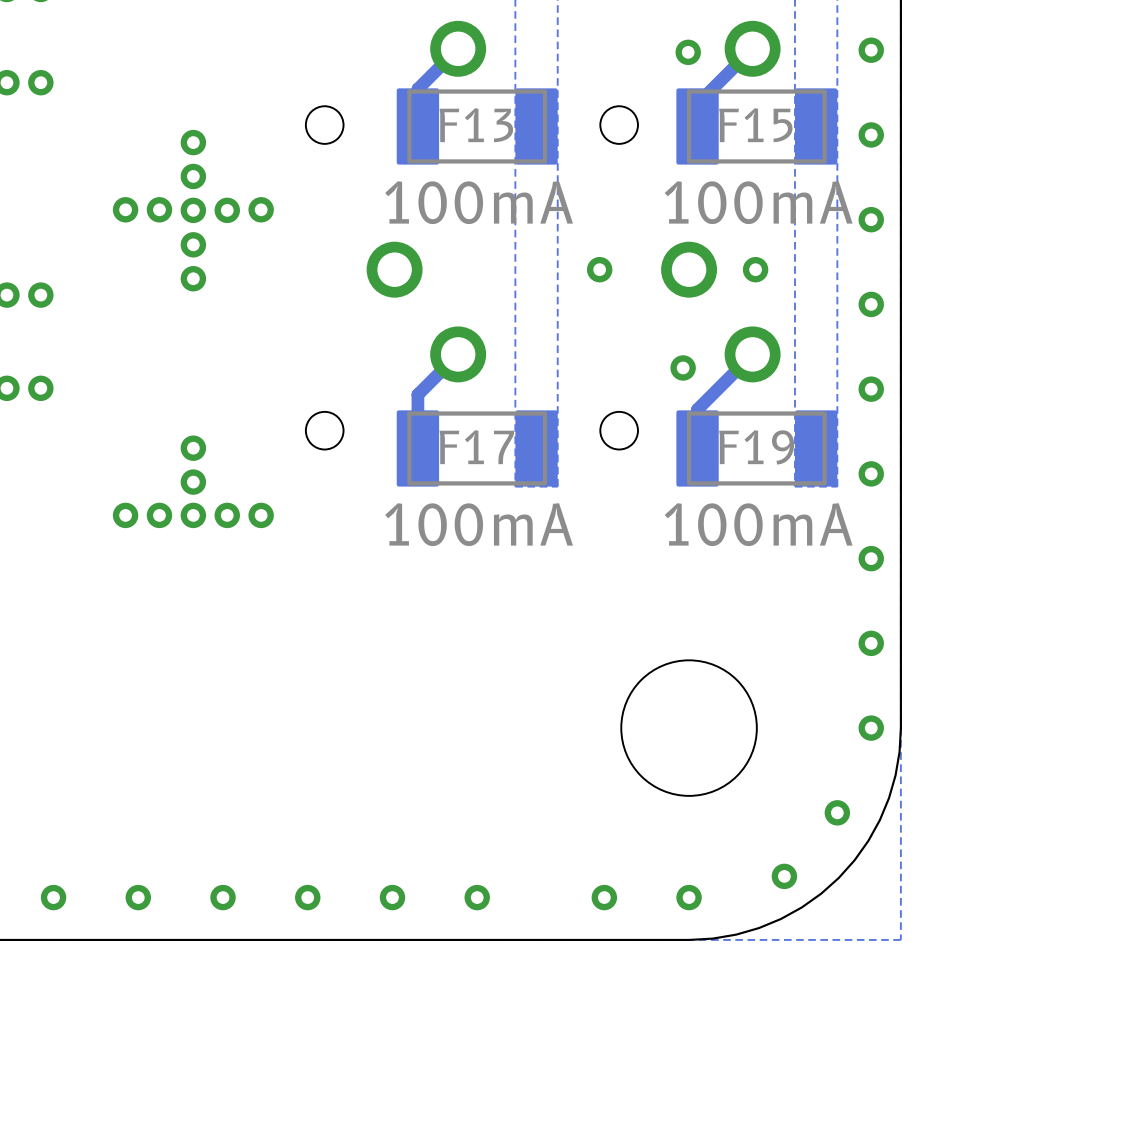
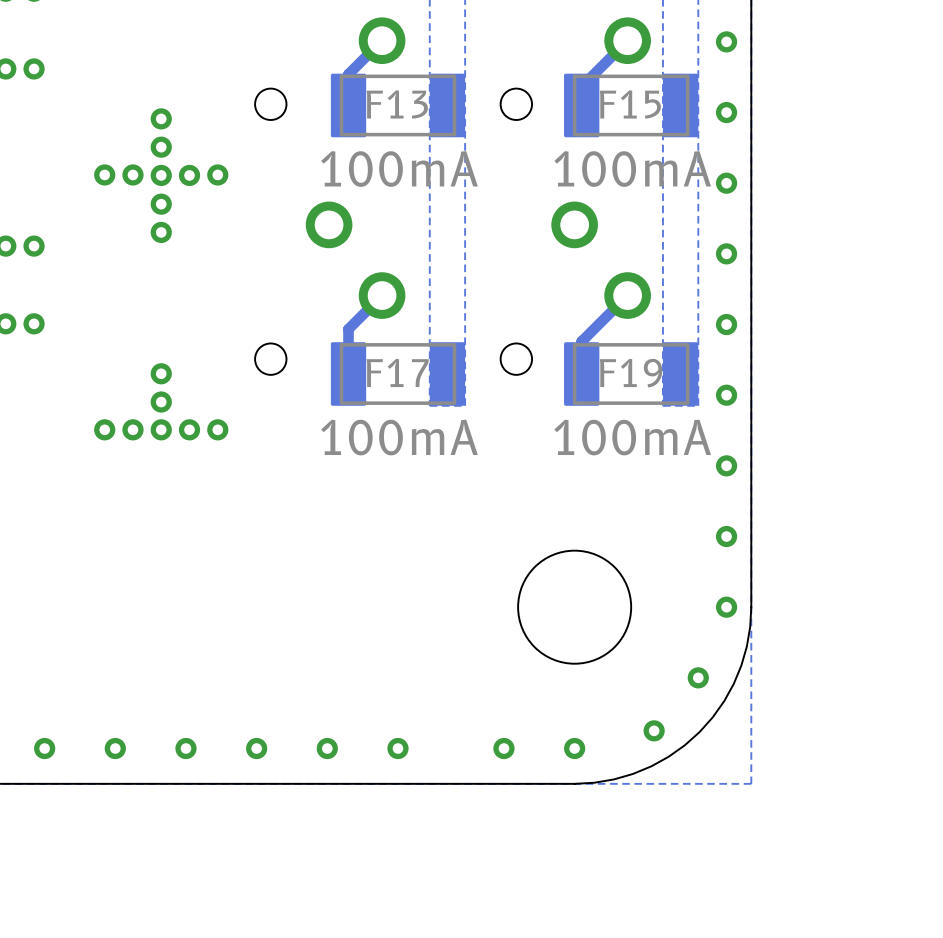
via: (688, 52) -> none
via: (599, 269) -> none
via: (755, 269) -> none
via: (683, 367) -> none

